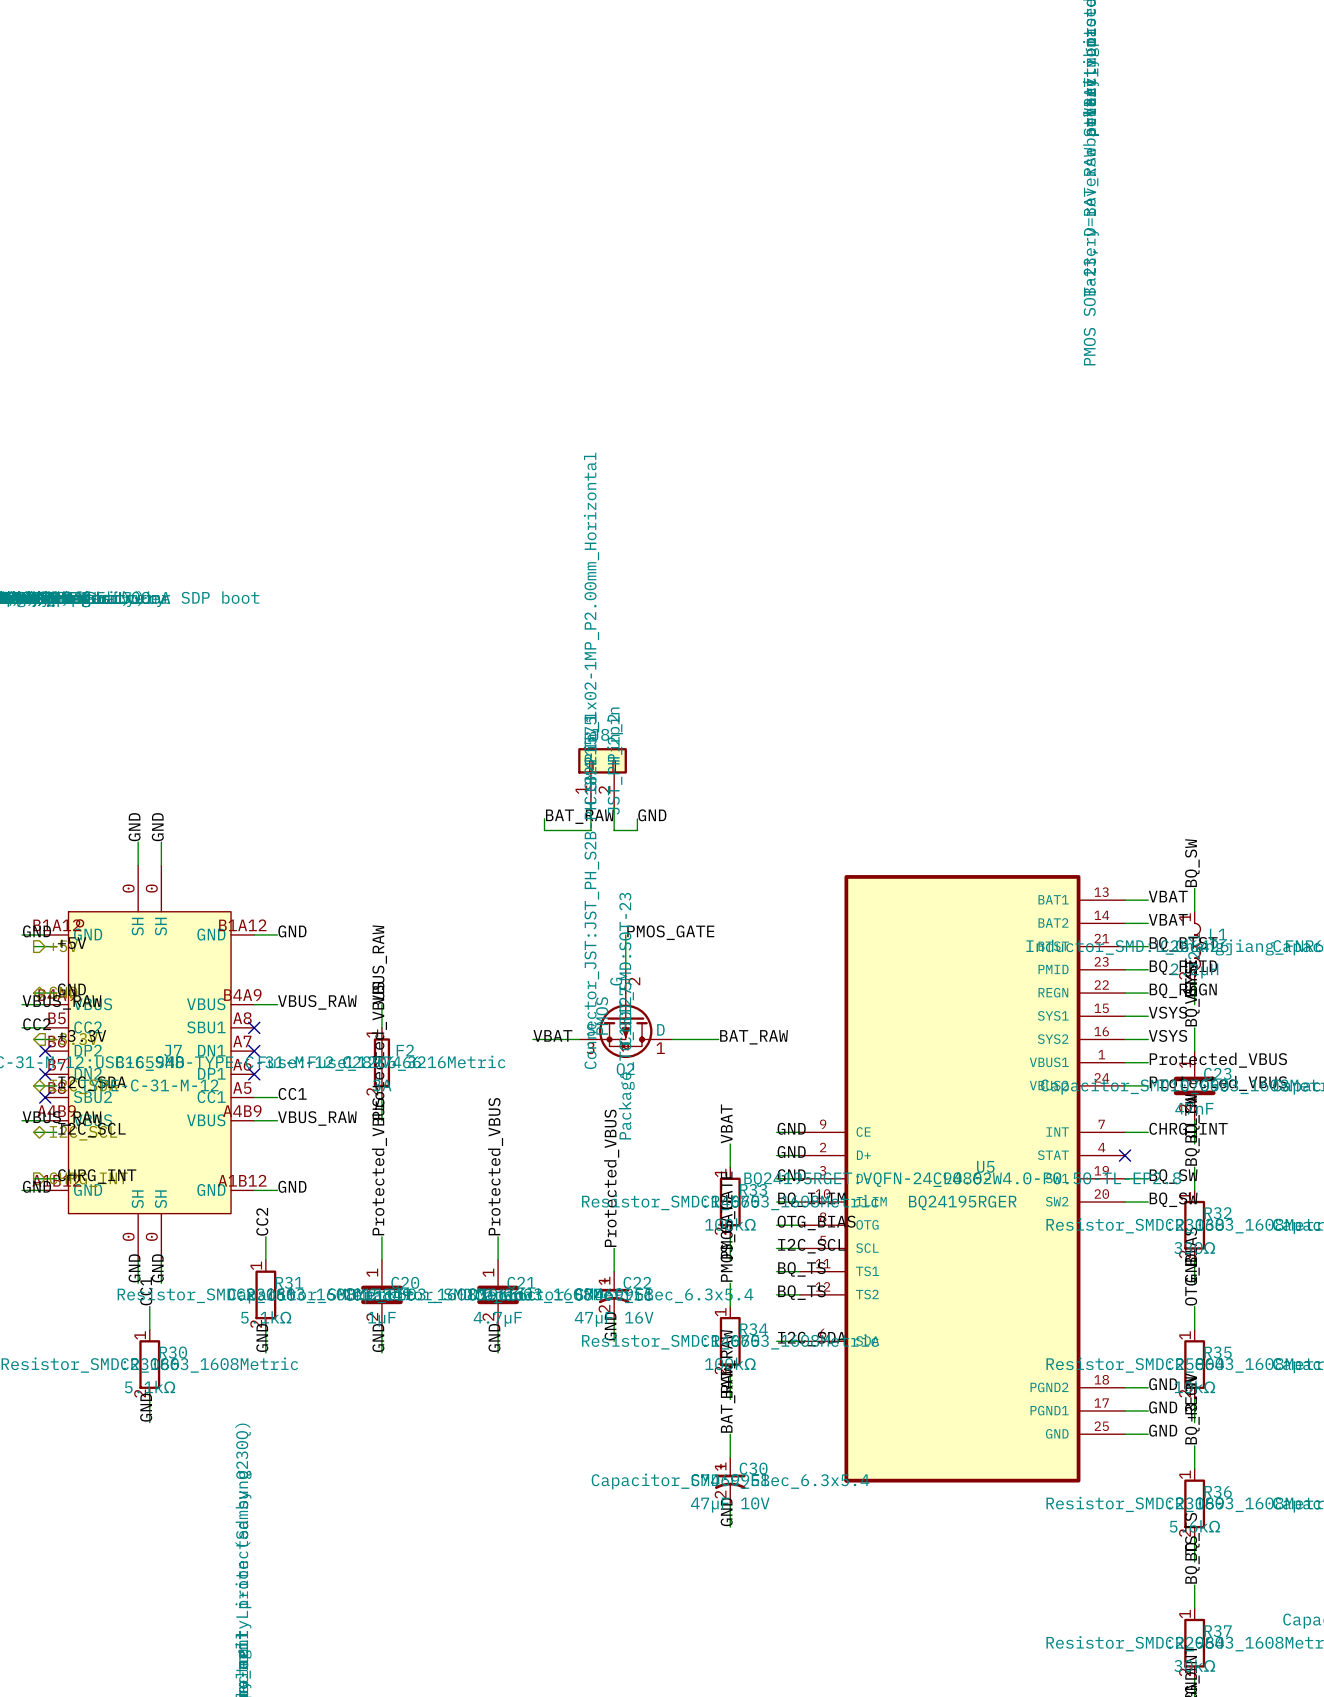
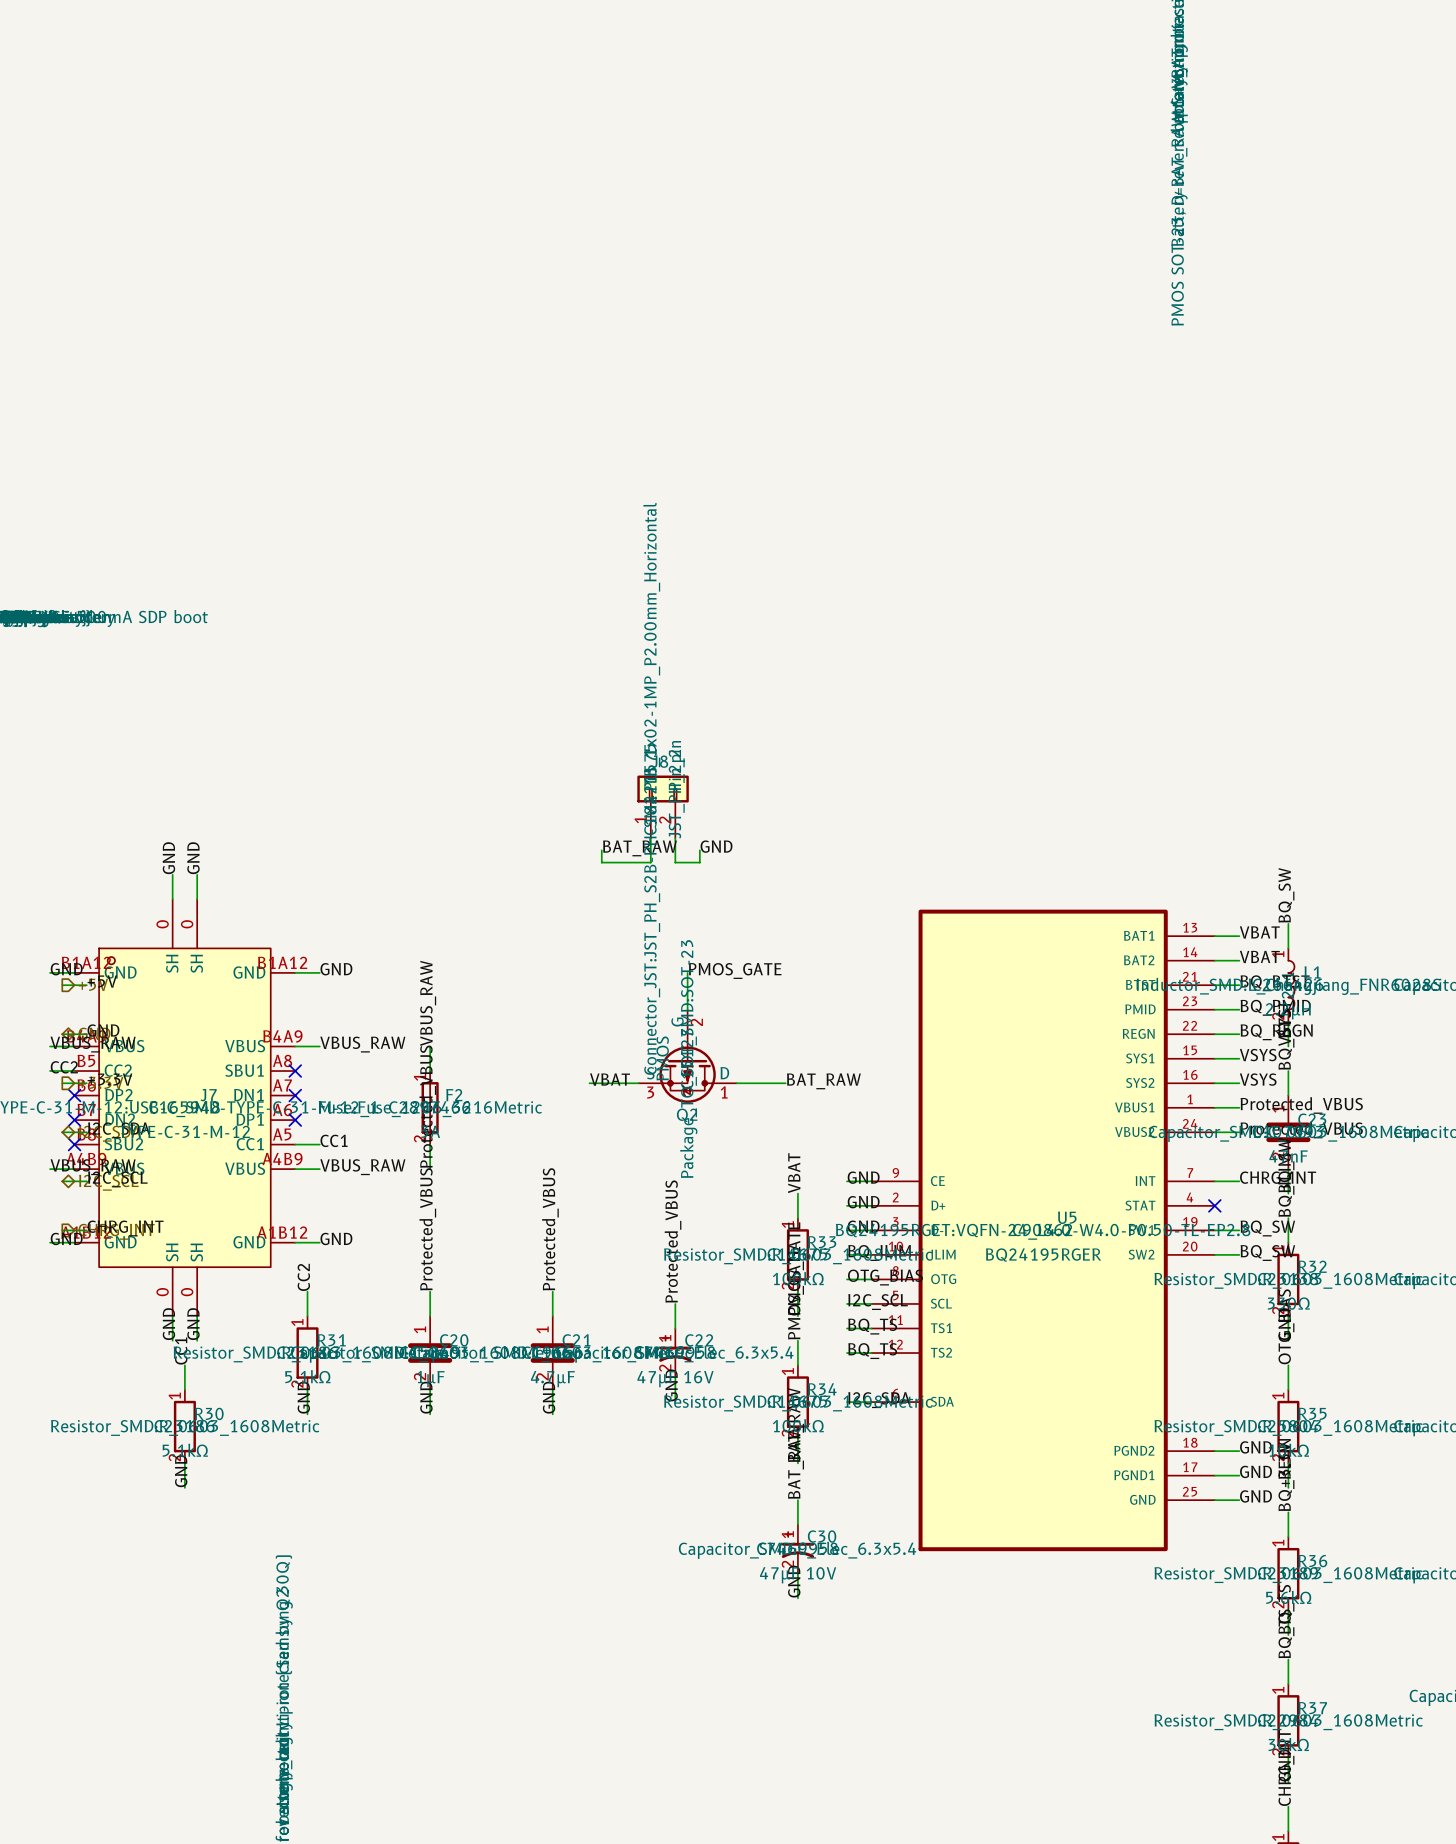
hierarchical label shape: input (73, 1039) -> output (101, 1082)

